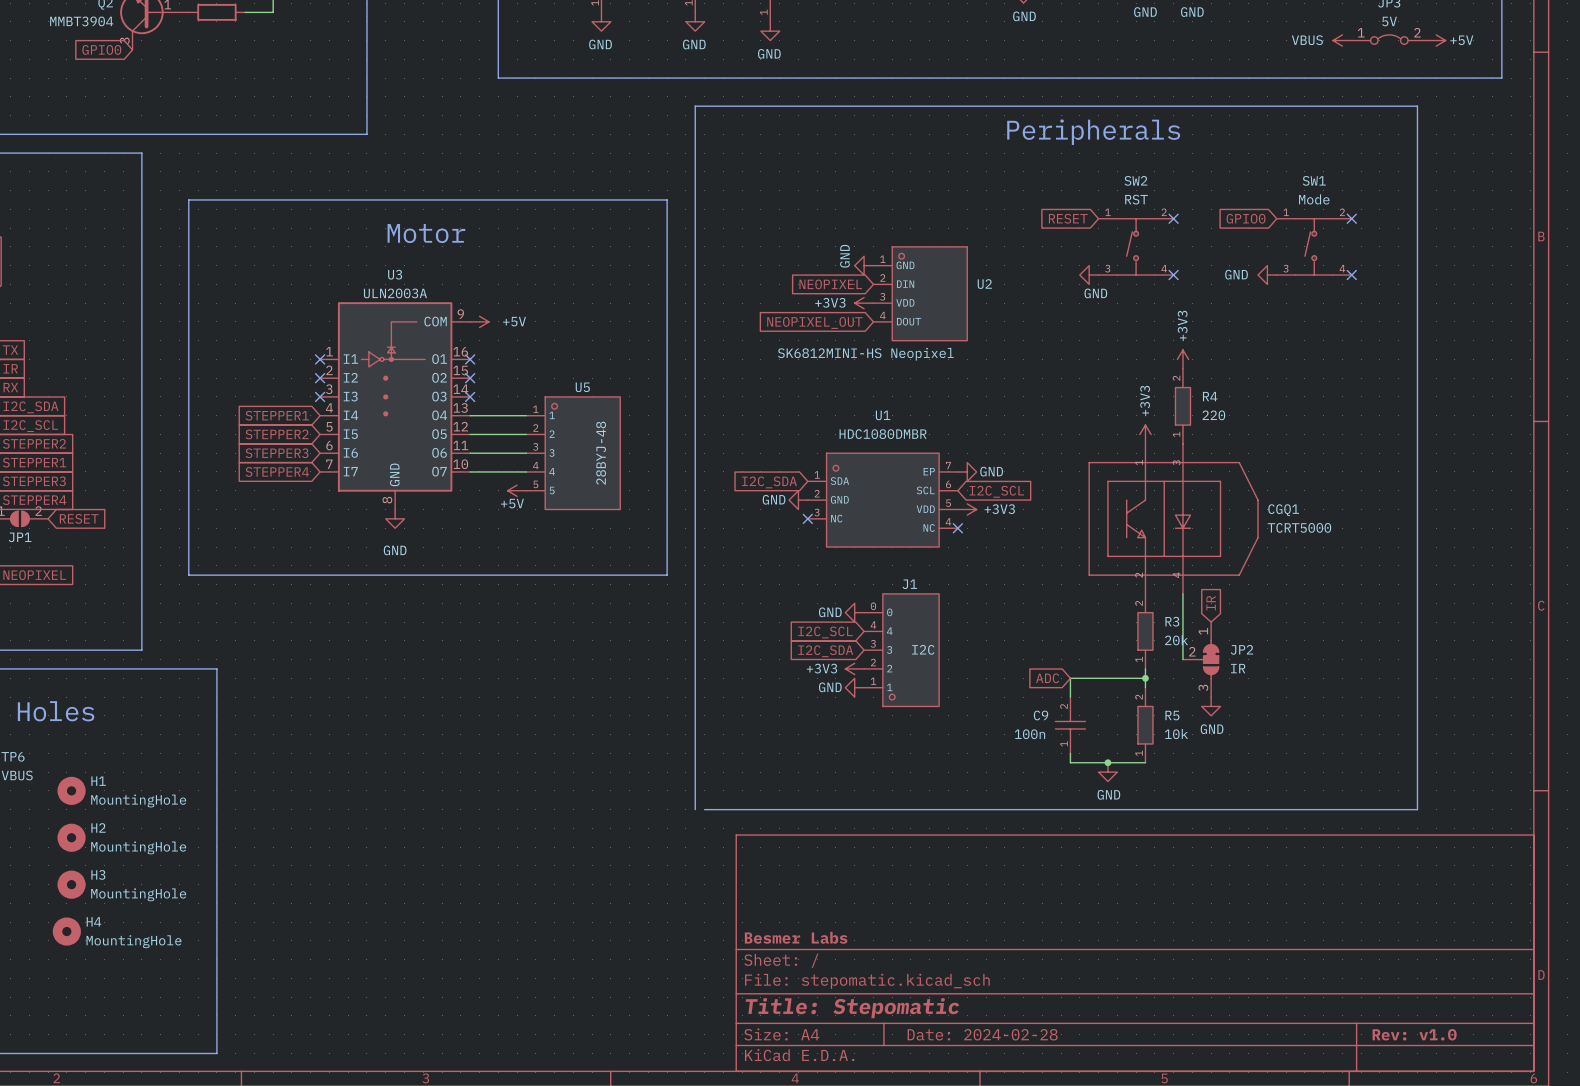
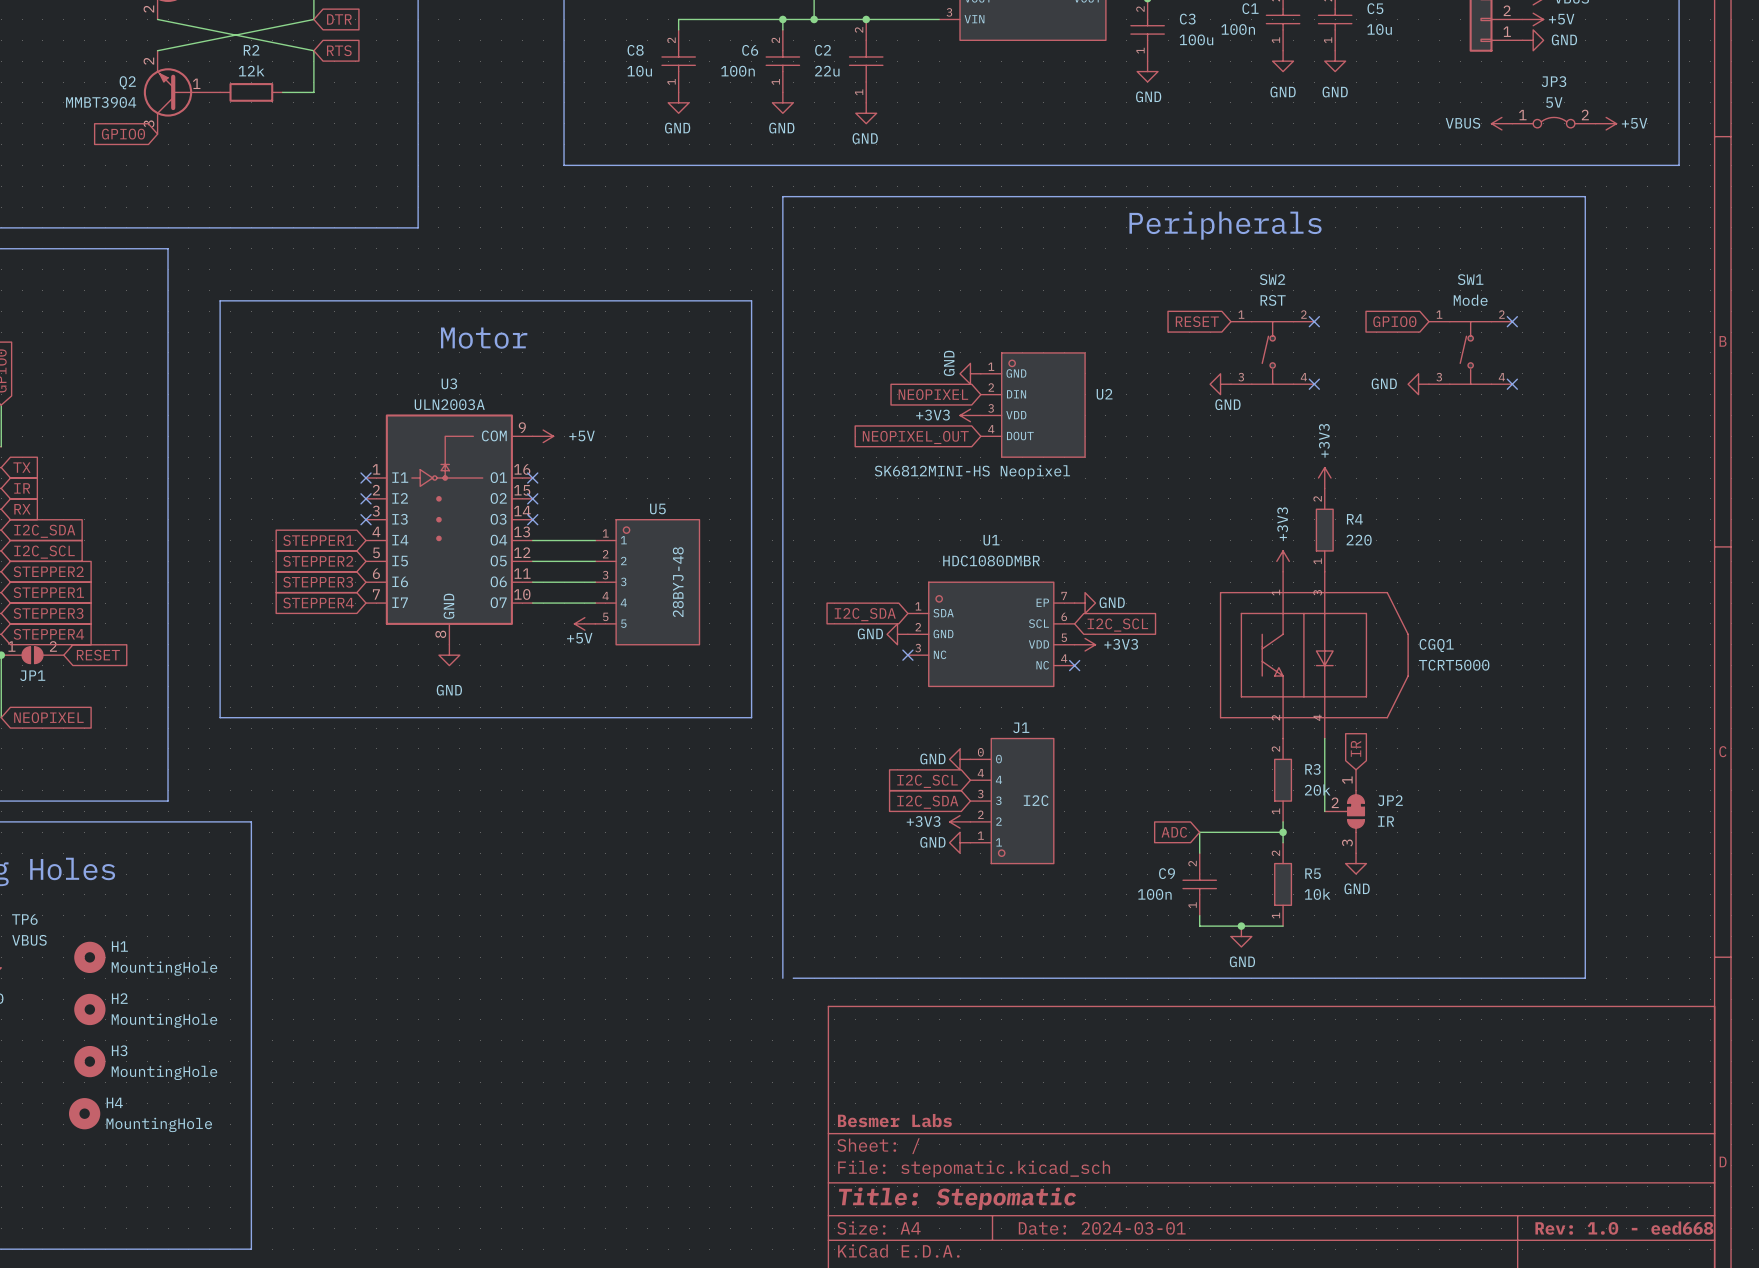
title block: Date: 2024-02-28 (982, 1034) -> Date: 2024-03-01 (1102, 1228)
title block: Rev: v1.0 (1414, 1034) -> Rev: 1.0 - eed668 (1624, 1228)

